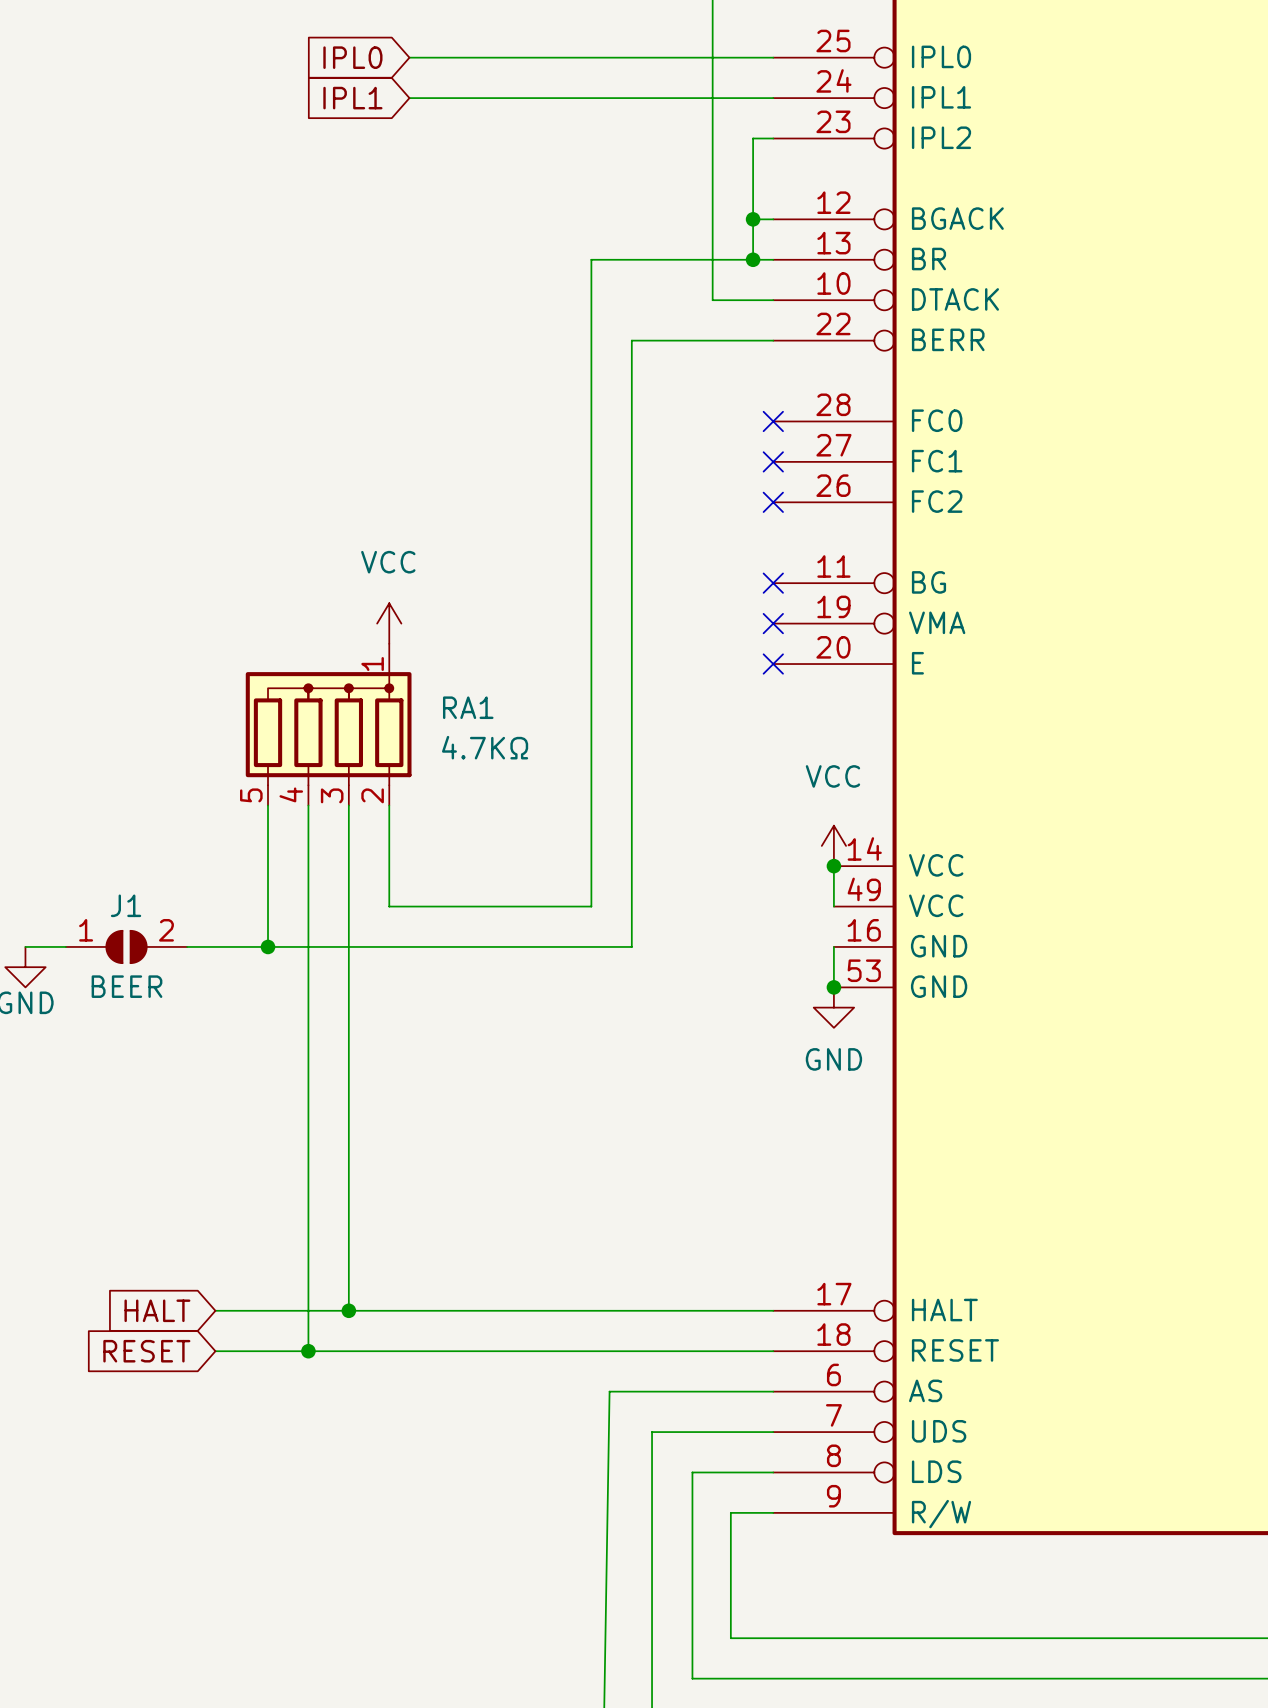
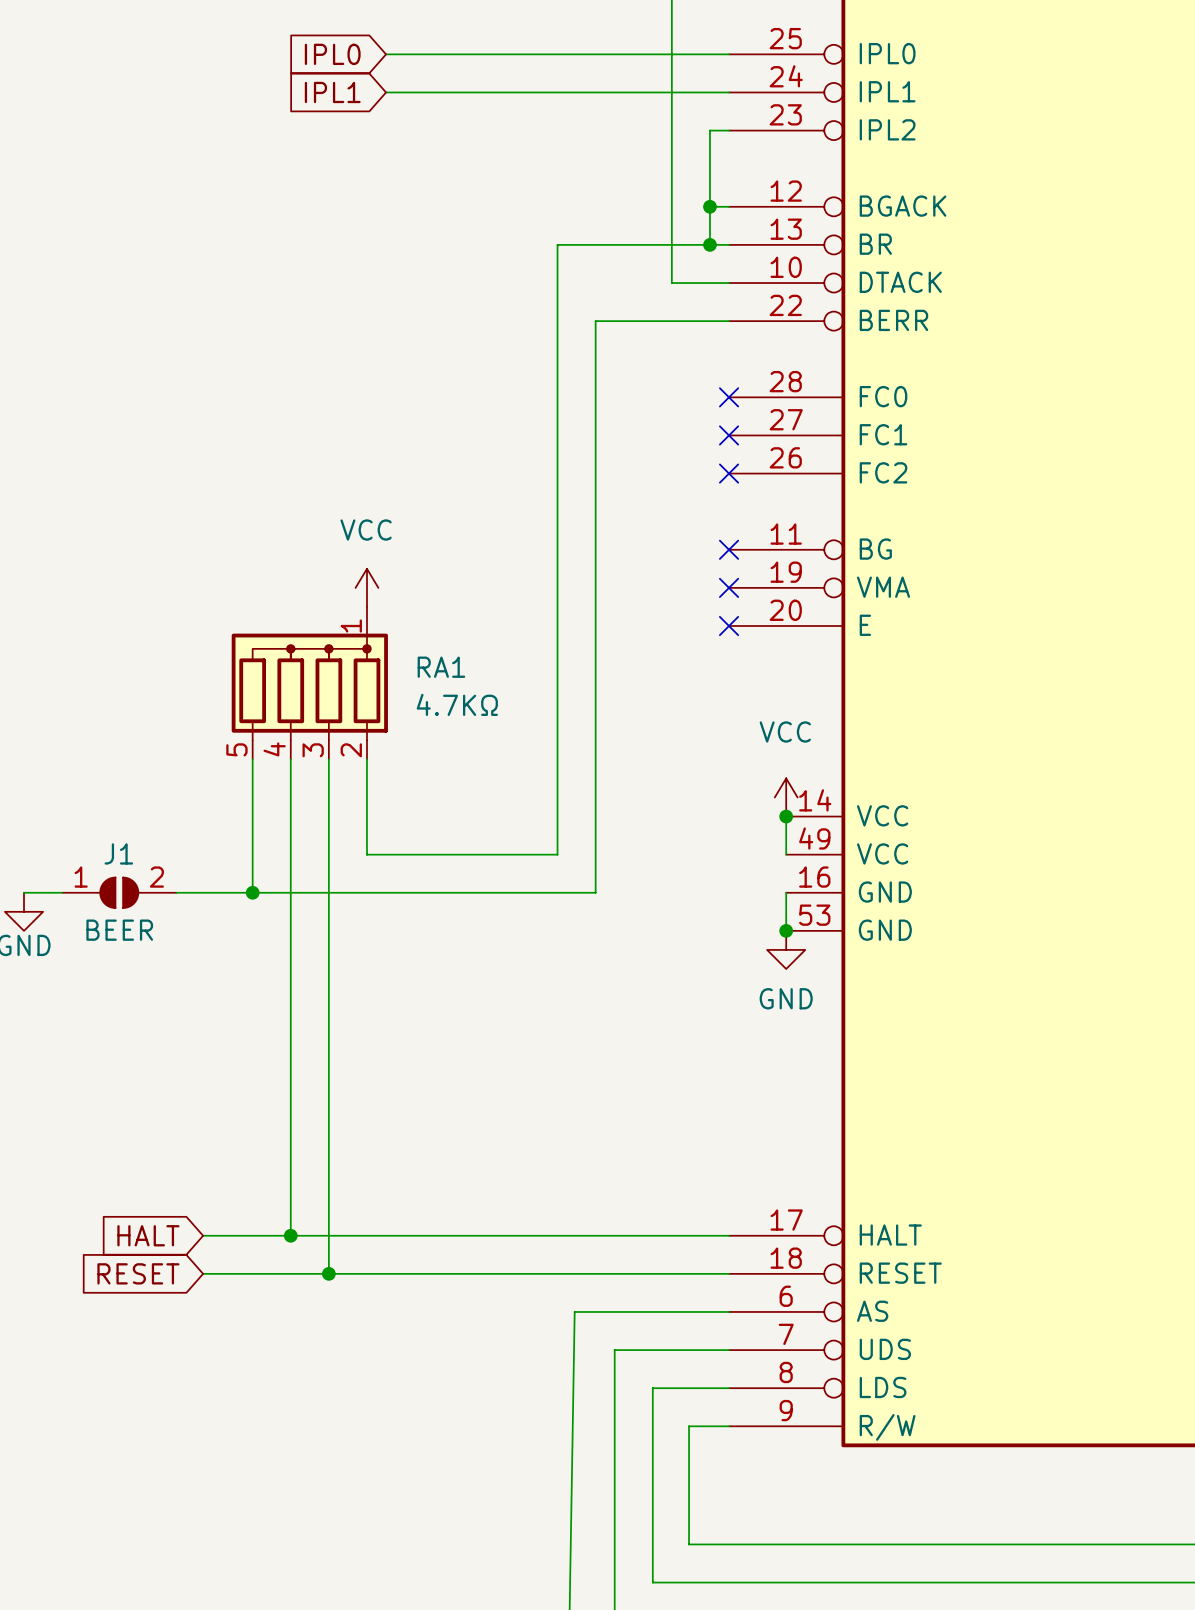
wire: (308, 1310) (308, 1351) -> (328, 1235) (328, 1273)
junction: none -> (290, 1235)
junction: (348, 1310) -> none
junction: (308, 1351) -> none
junction: none -> (328, 1273)

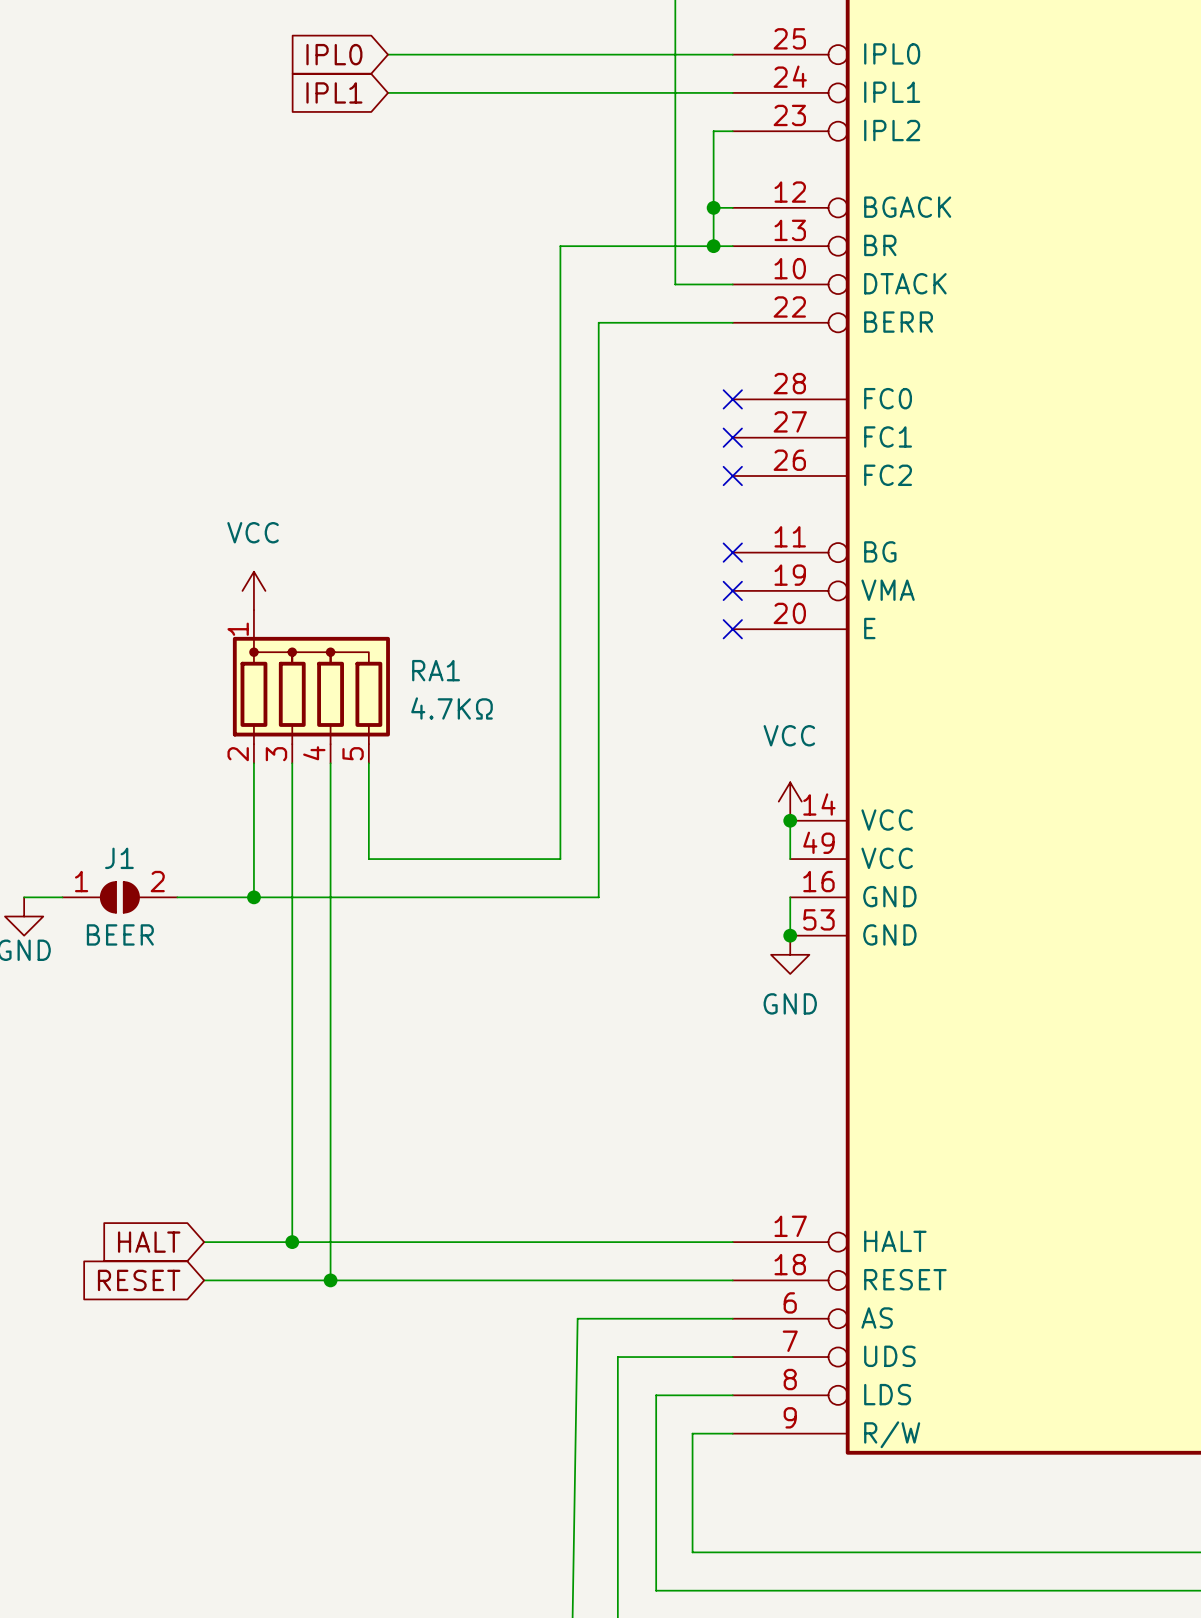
power symbol position: VCC (366, 587) -> VCC (253, 590)
RA1 flip: as is (309, 686) -> left-right (311, 690)

